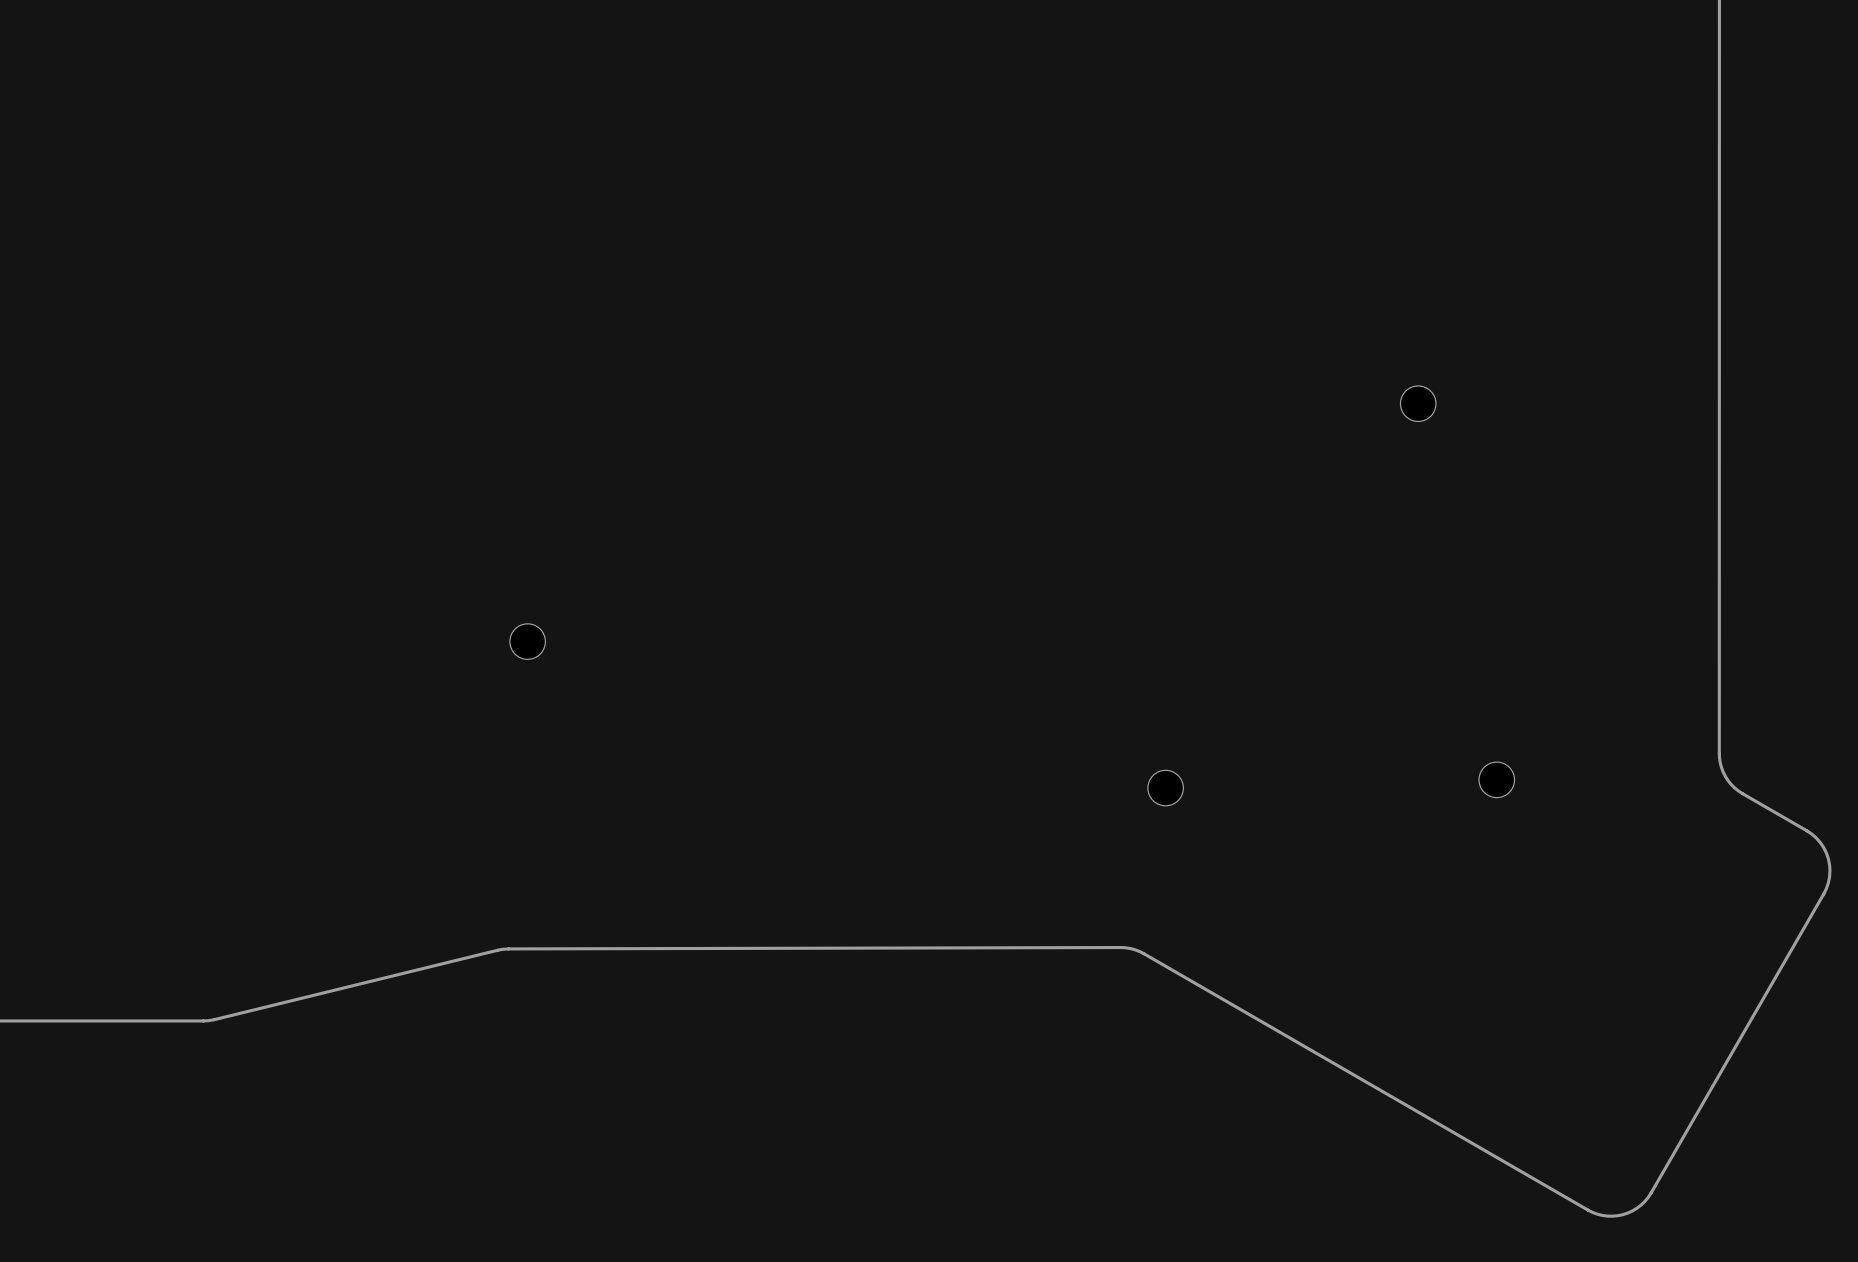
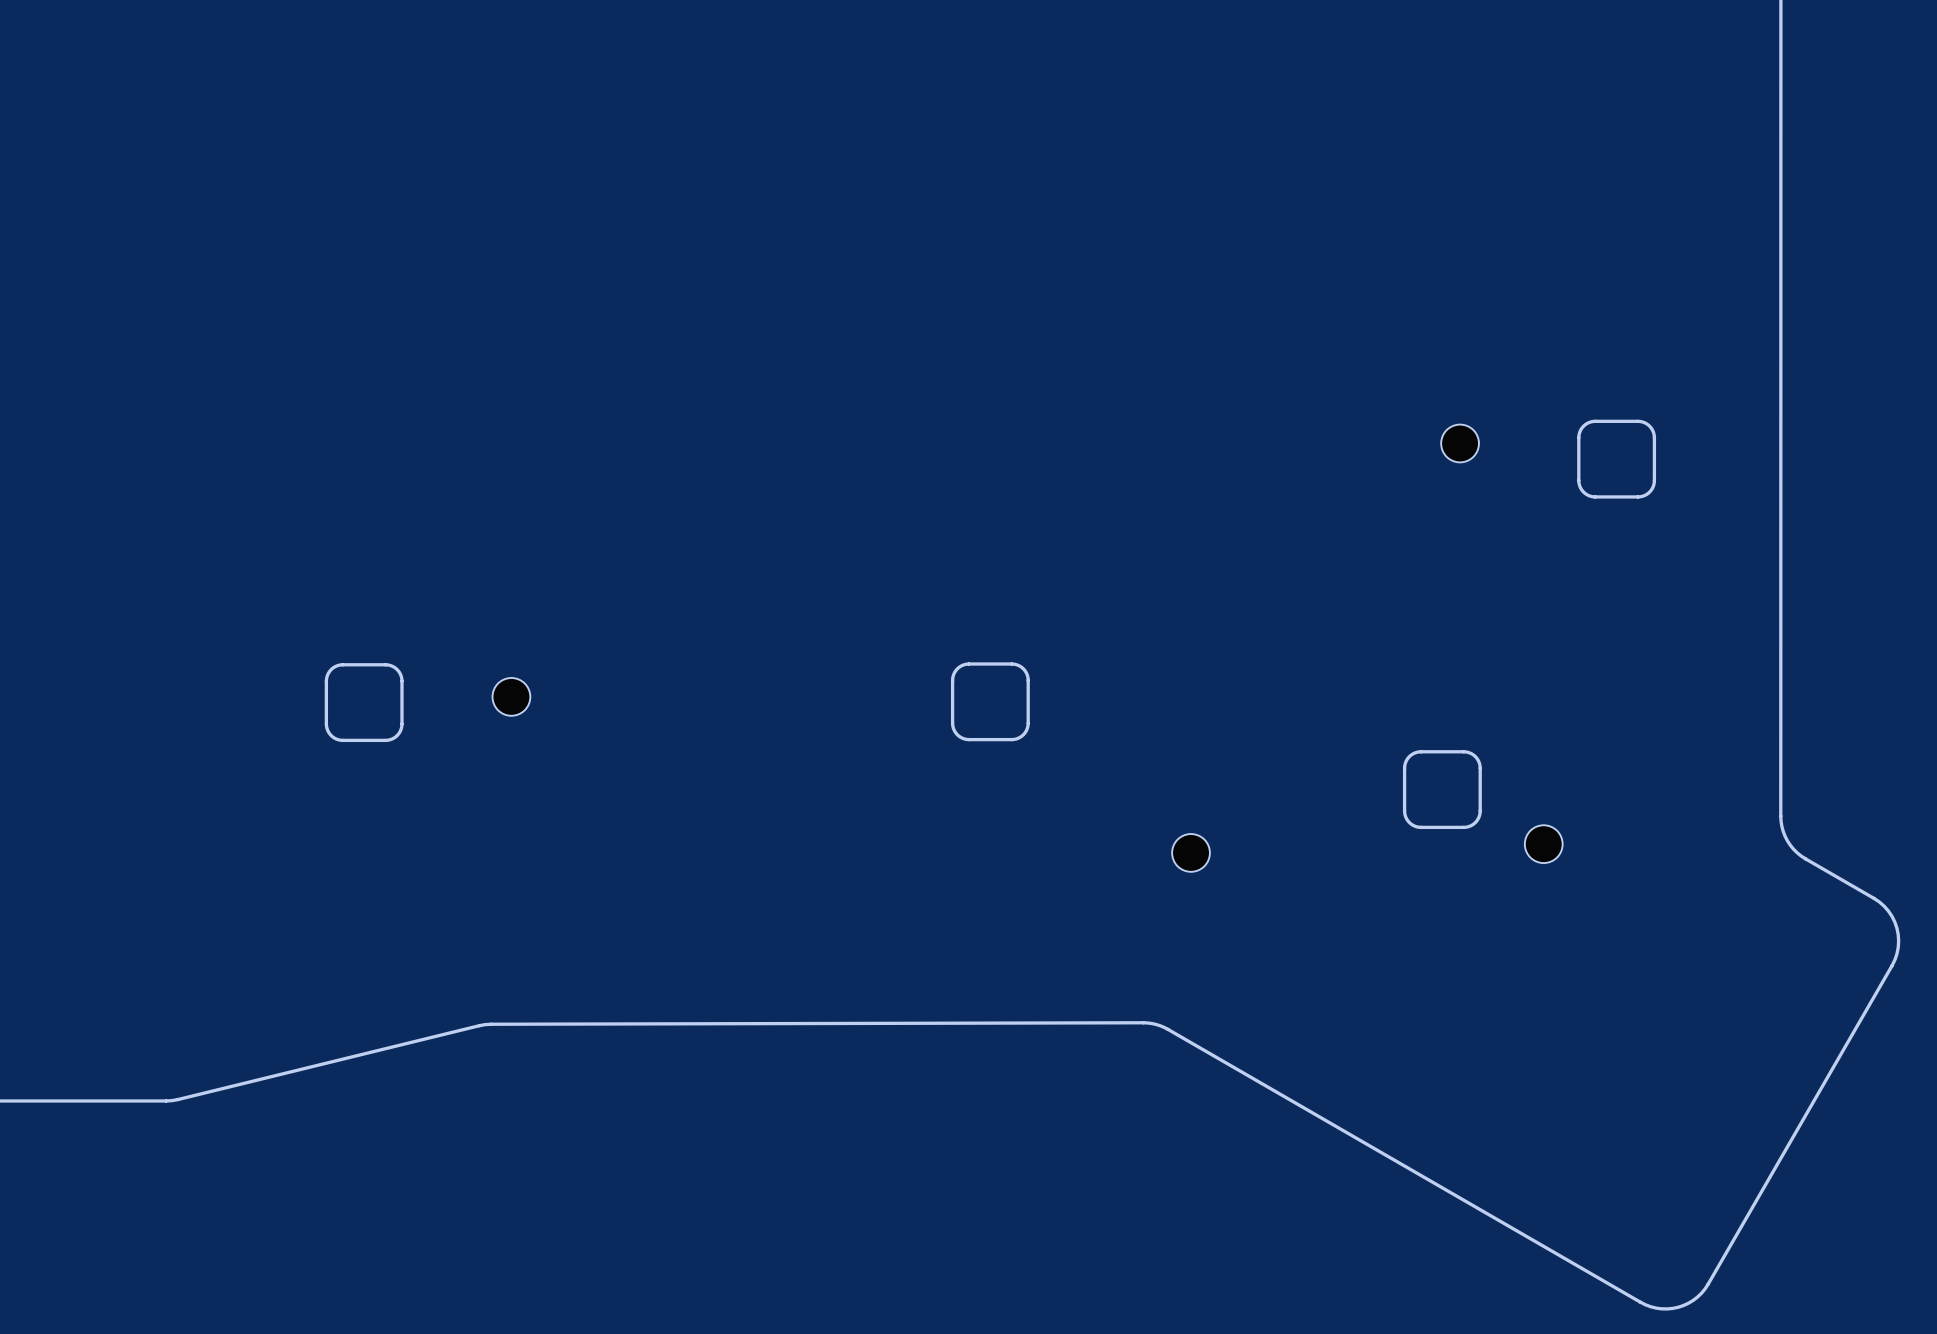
board edge: none -> (1595, 421) (1640, 421) (1651, 427) (1654, 437) (1654, 480) (1652, 487) (1648, 493) (1639, 496) (1595, 496) (1588, 495) (1582, 490) (1578, 482) (1578, 435) (1585, 424) (1595, 421)
board edge: none -> (969, 664) (1013, 664) (1024, 670) (1028, 678) (1028, 723) (1026, 729) (1021, 736) (1011, 739) (969, 739) (960, 737) (955, 733) (952, 723) (953, 676) (958, 667) (969, 664)
board edge: none -> (342, 664) (387, 664) (398, 670) (401, 679) (401, 723) (400, 731) (395, 736) (387, 740) (342, 740) (334, 738) (329, 733) (326, 723) (326, 679) (331, 669) (342, 664)
board edge: none -> (1421, 751) (1465, 751) (1476, 758) (1480, 768) (1480, 810) (1478, 818) (1474, 823) (1465, 827) (1421, 827) (1413, 825) (1408, 821) (1404, 812) (1404, 766) (1409, 756) (1421, 751)

